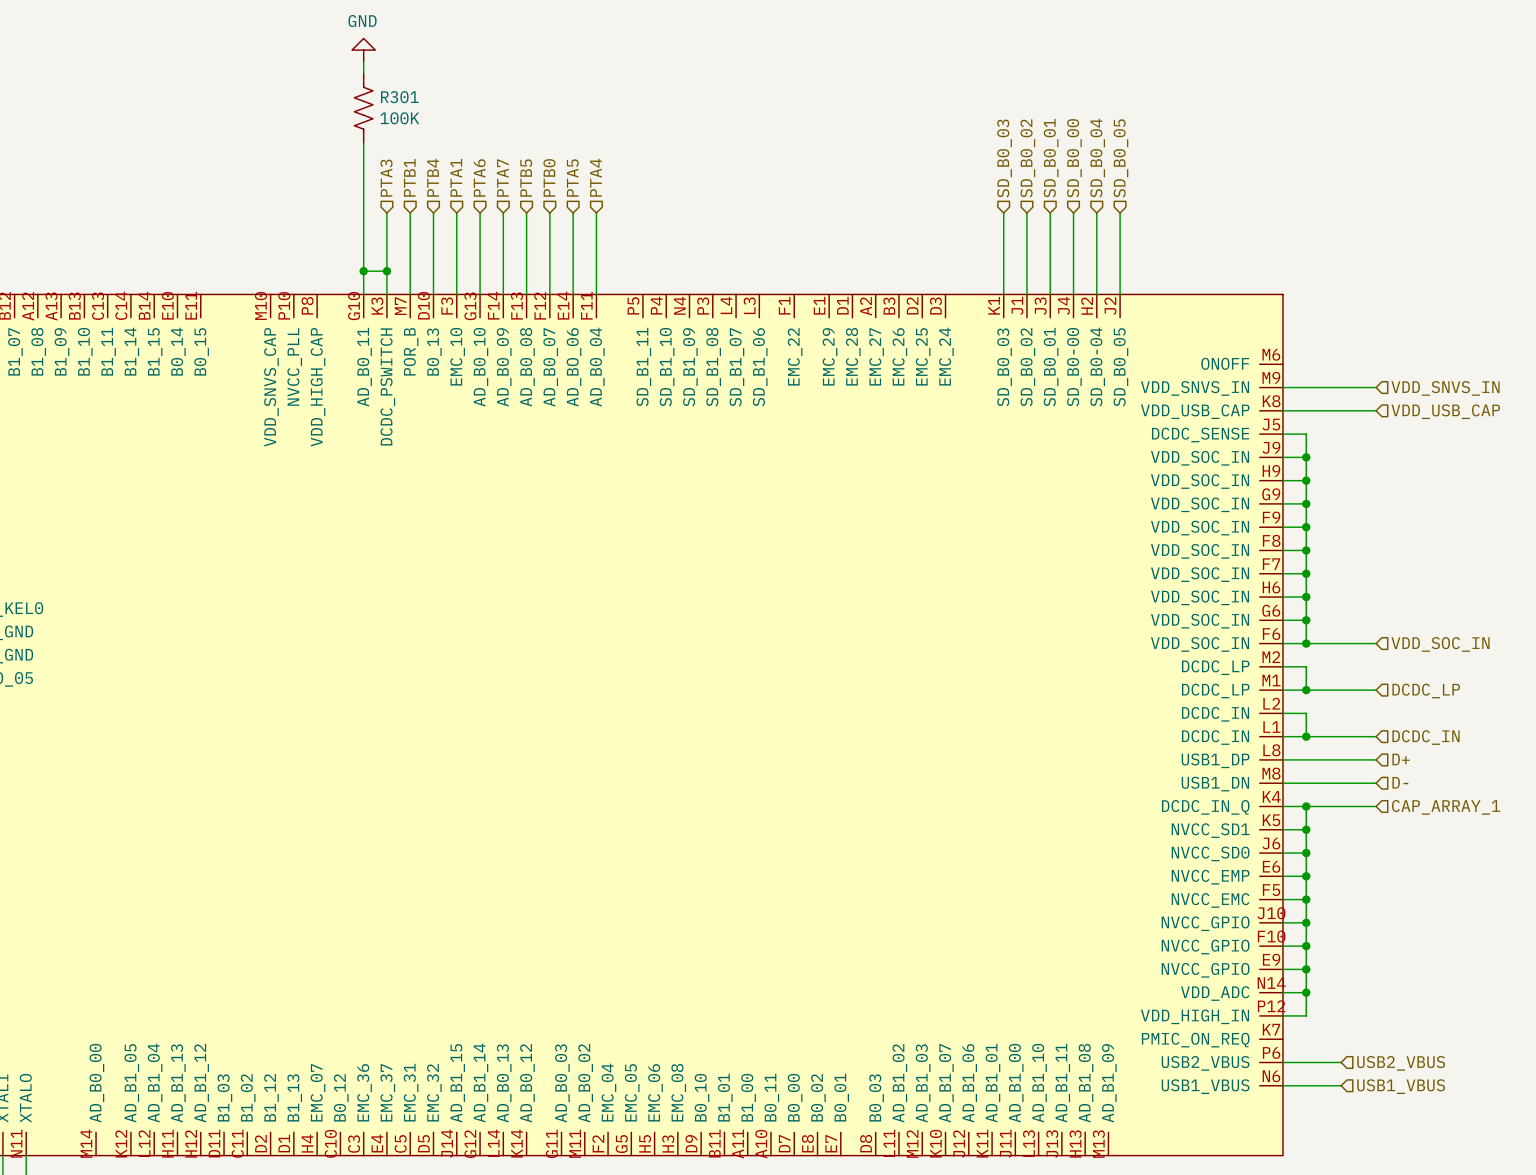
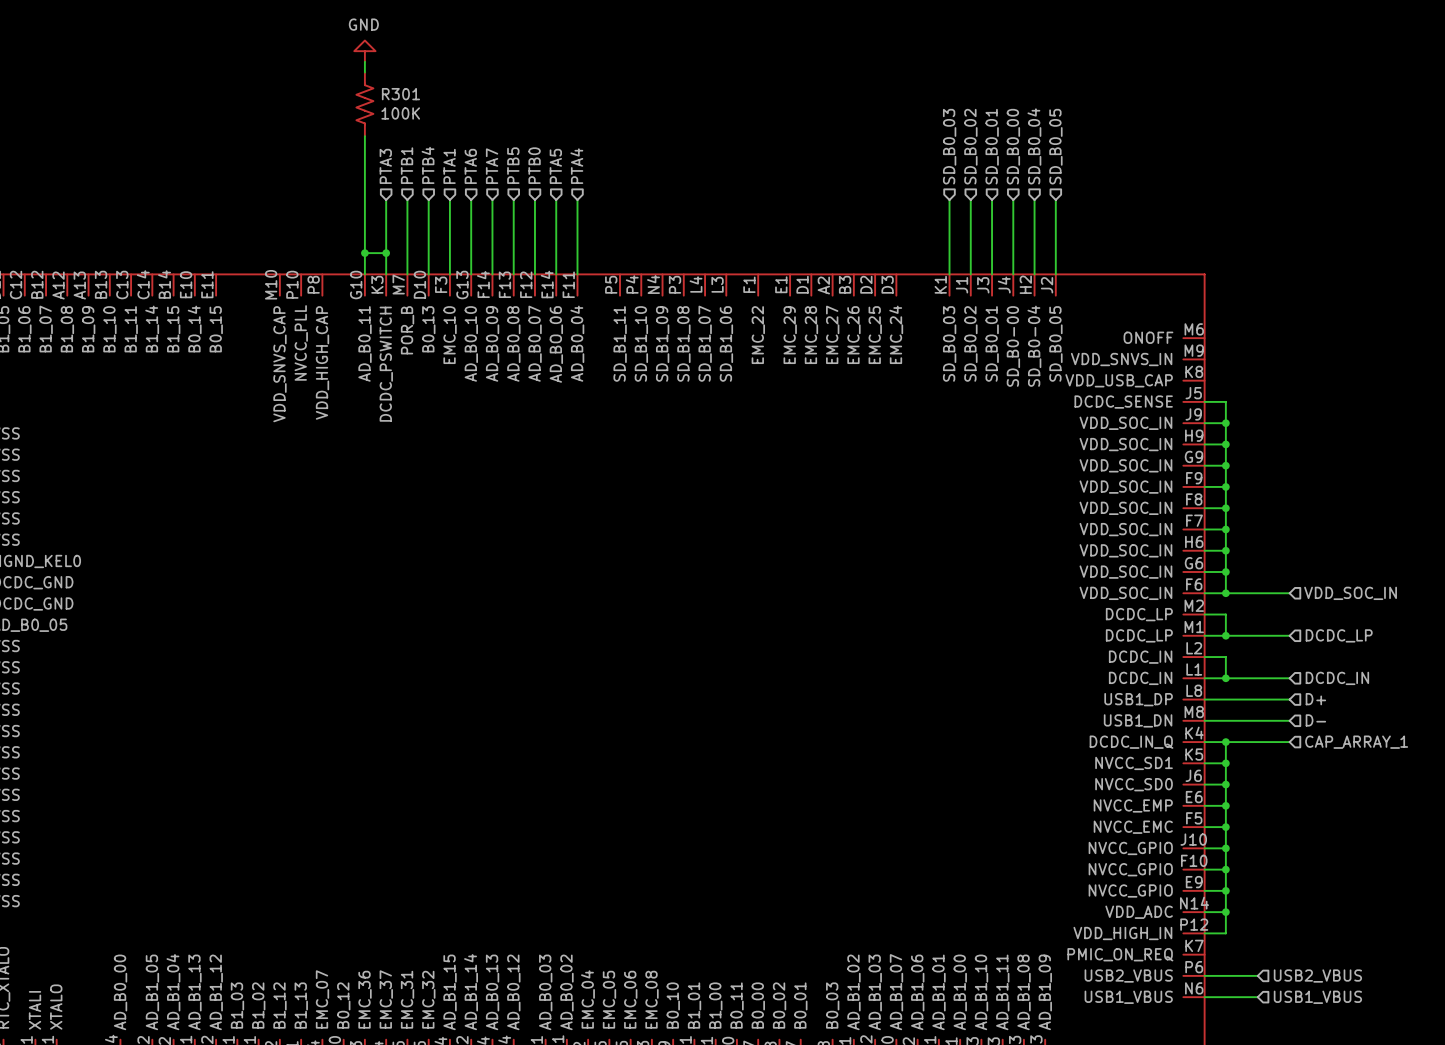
wire: (1282, 387) (1376, 387) -> none
hierarchical label: VDD_SNVS_IN (1445, 388) -> none
wire: (1282, 410) (1376, 410) -> none
hierarchical label: VDD_USB_CAP (1445, 411) -> none

